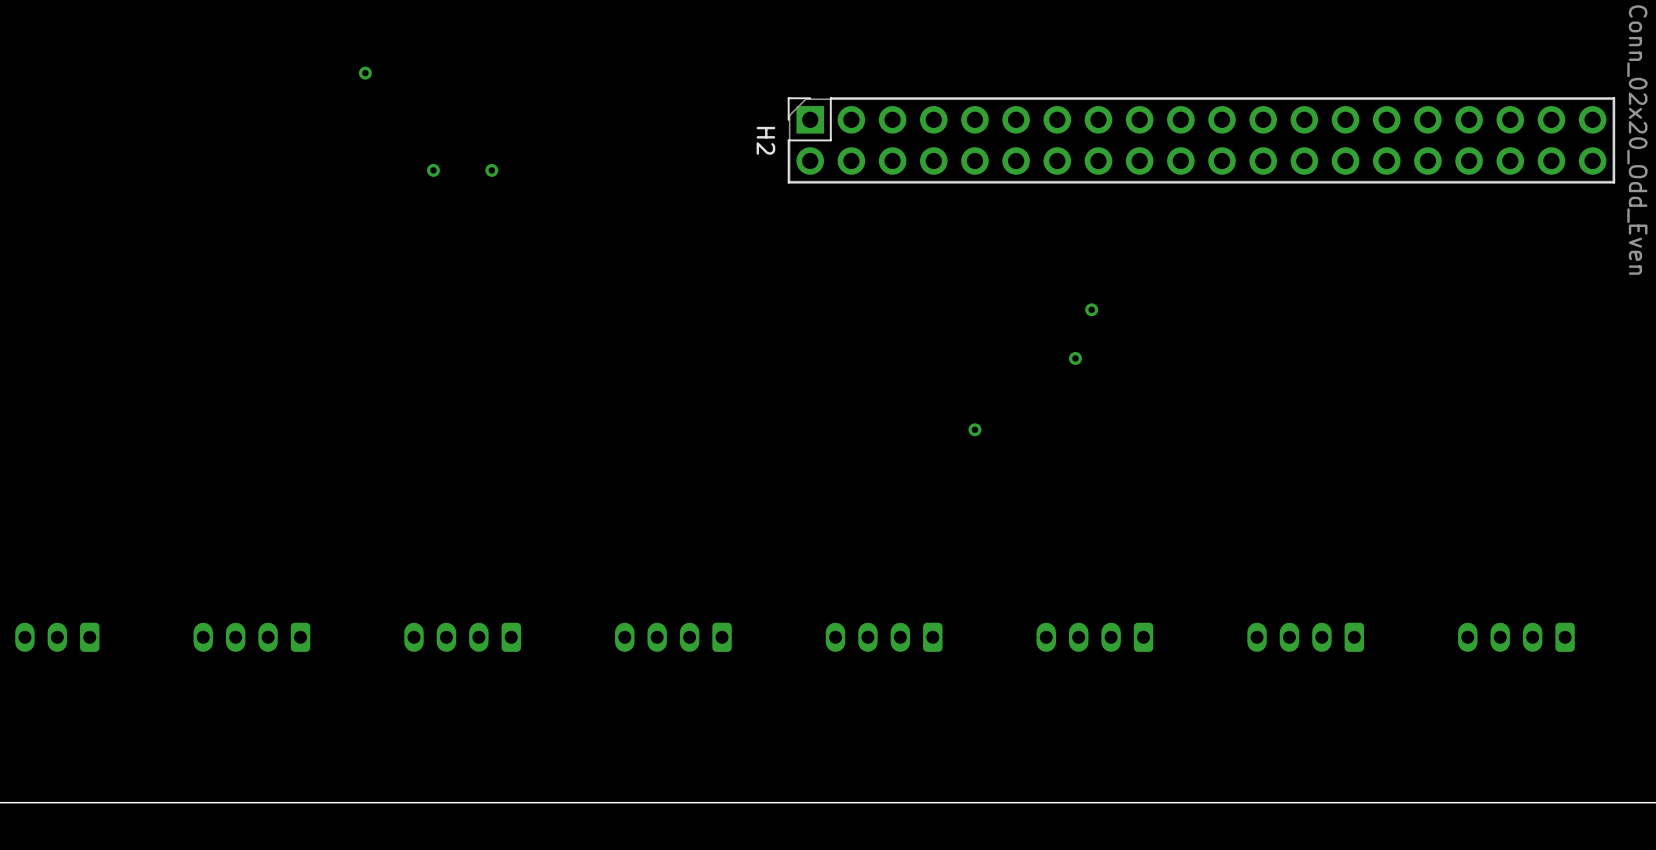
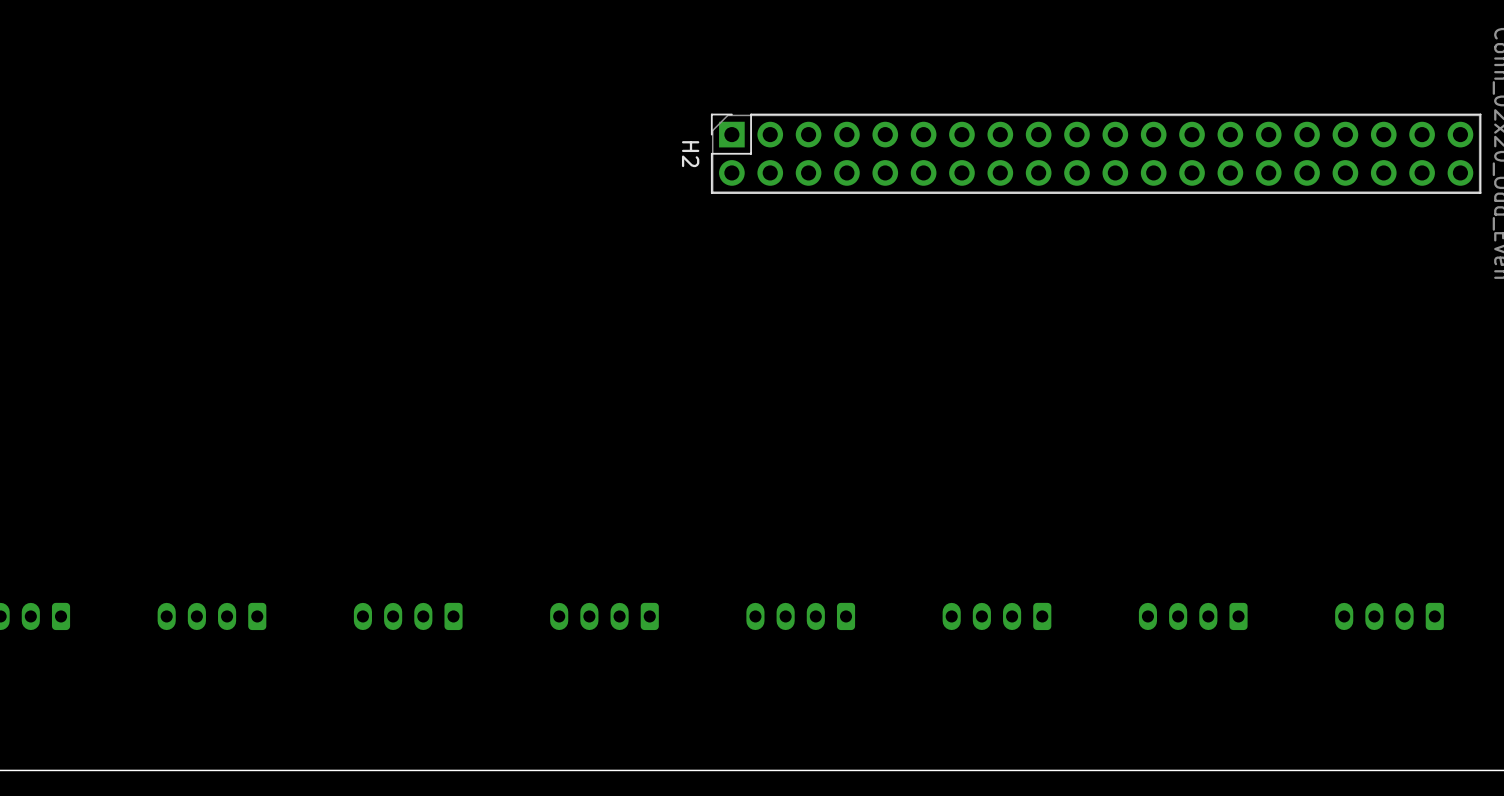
via: (365, 73) -> none
via: (433, 170) -> none
via: (491, 170) -> none
via: (1091, 309) -> none
via: (1075, 358) -> none
via: (974, 429) -> none

